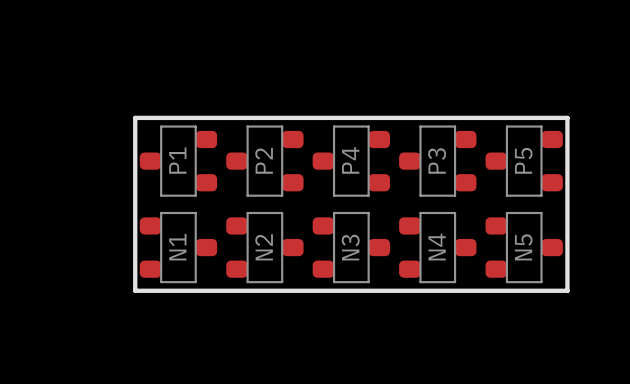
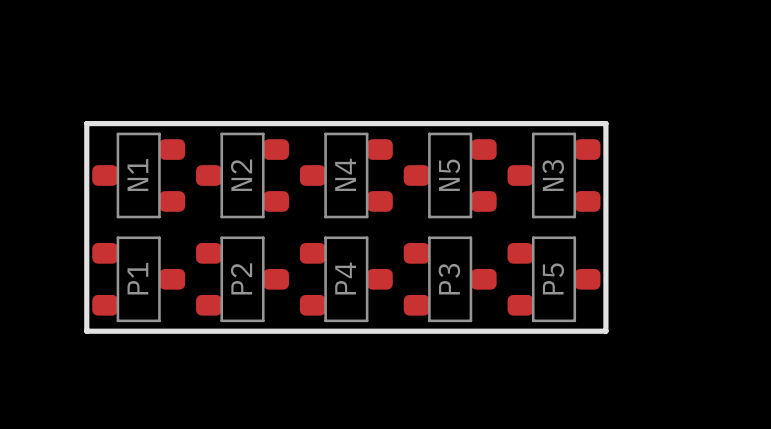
P1 name: P1 (177, 160) -> N1 (137, 175)
P2 name: P2 (264, 160) -> N2 (241, 175)
P4 name: P4 (350, 160) -> N4 (345, 174)
P5 name: P5 (523, 160) -> N3 (553, 175)
P3 name: P3 (437, 161) -> N5 (449, 175)
N1 name: N1 (177, 247) -> P1 (137, 278)
N2 name: N2 (264, 247) -> P2 (241, 278)
N3 name: N3 (350, 247) -> P4 (345, 278)
N4 name: N4 (437, 247) -> P3 (449, 279)
N5 name: N5 (523, 247) -> P5 (553, 278)

